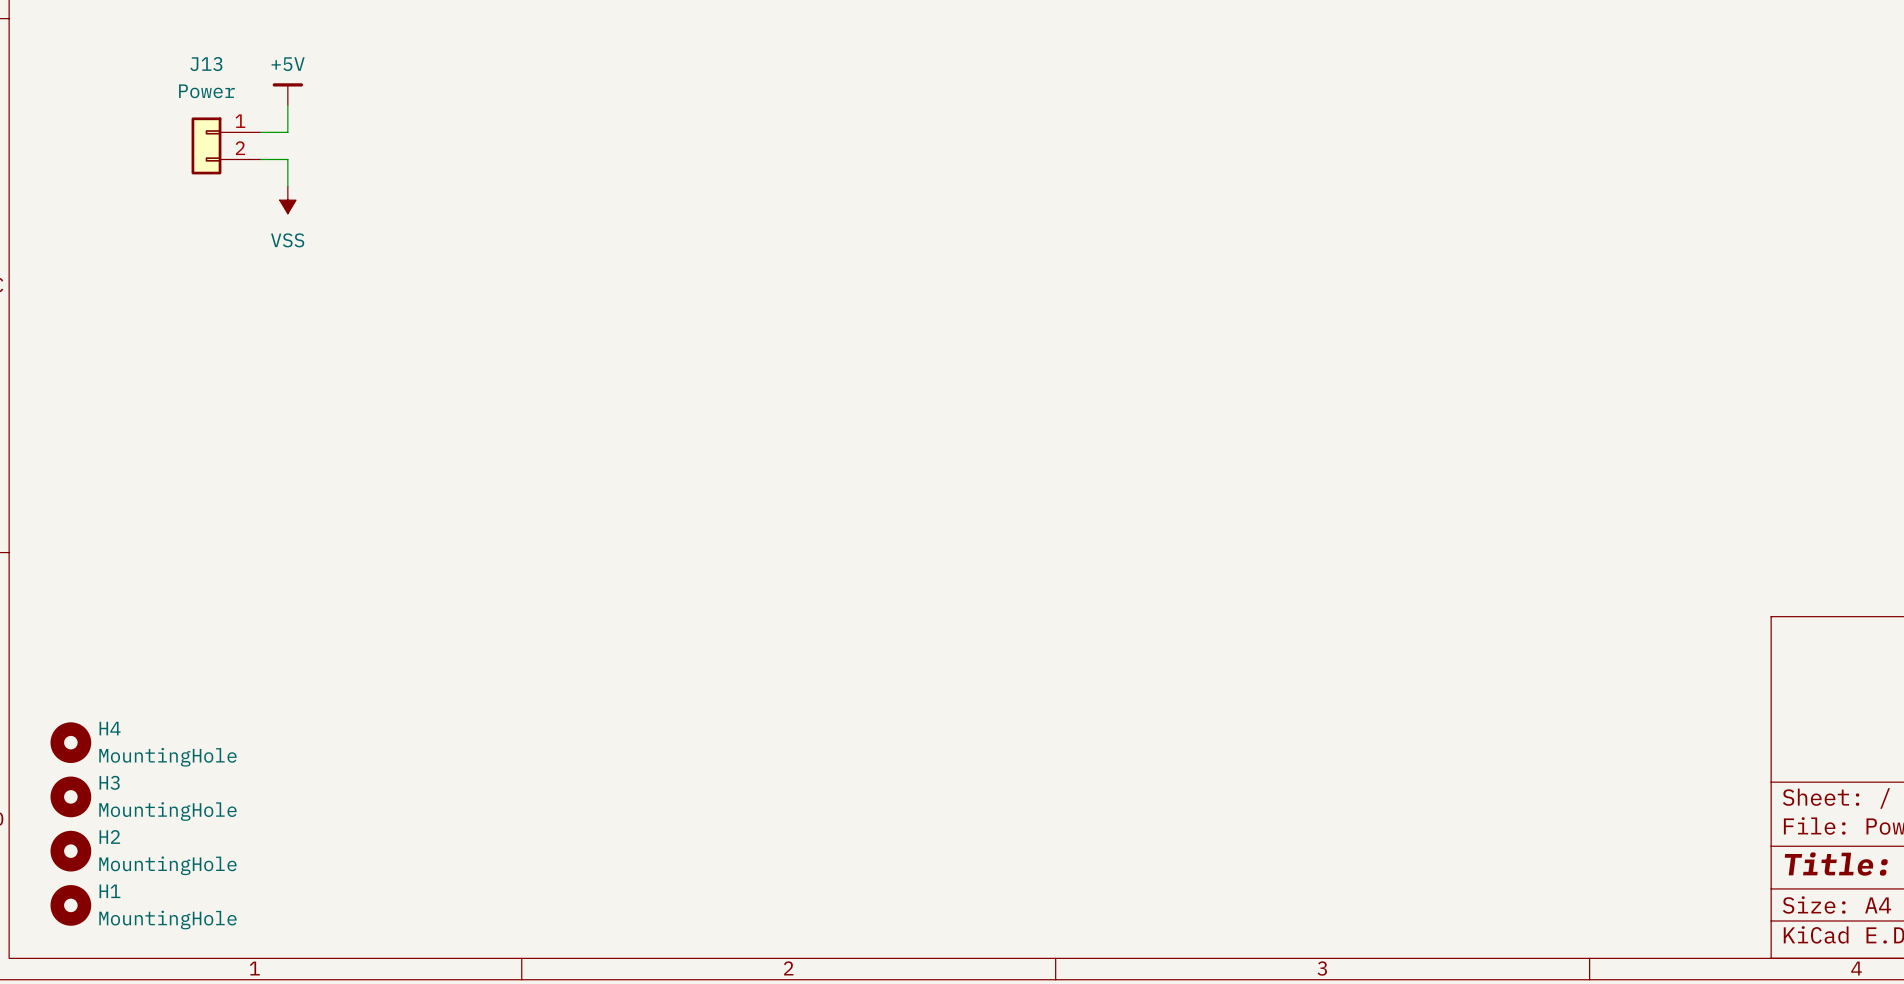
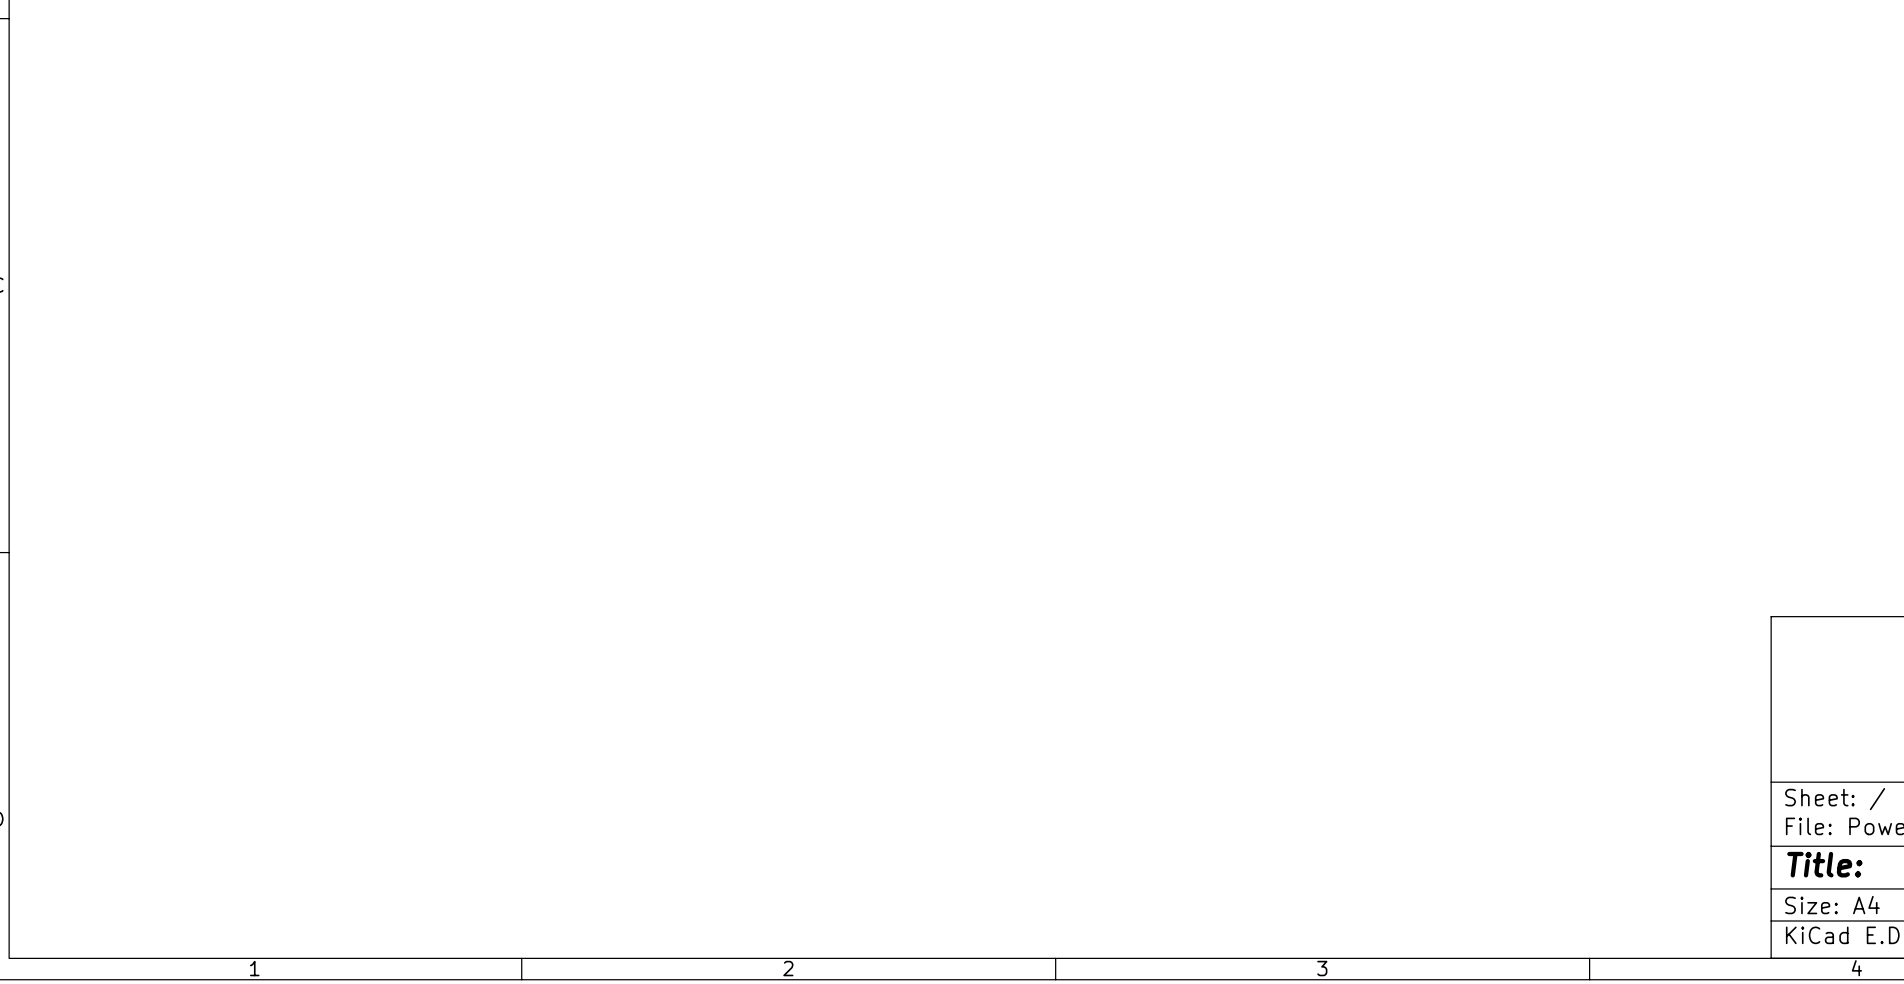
power symbol: +5V (287, 94) -> none
wire: (287, 105) (287, 132) (260, 132) -> none
J13: Power (226, 145) -> none
wire: (260, 159) (287, 159) (287, 186) -> none
power symbol: VSS (287, 200) -> none
H4: MountingHole (70, 742) -> none
H3: MountingHole (70, 796) -> none
H2: MountingHole (70, 851) -> none
H1: MountingHole (70, 905) -> none

